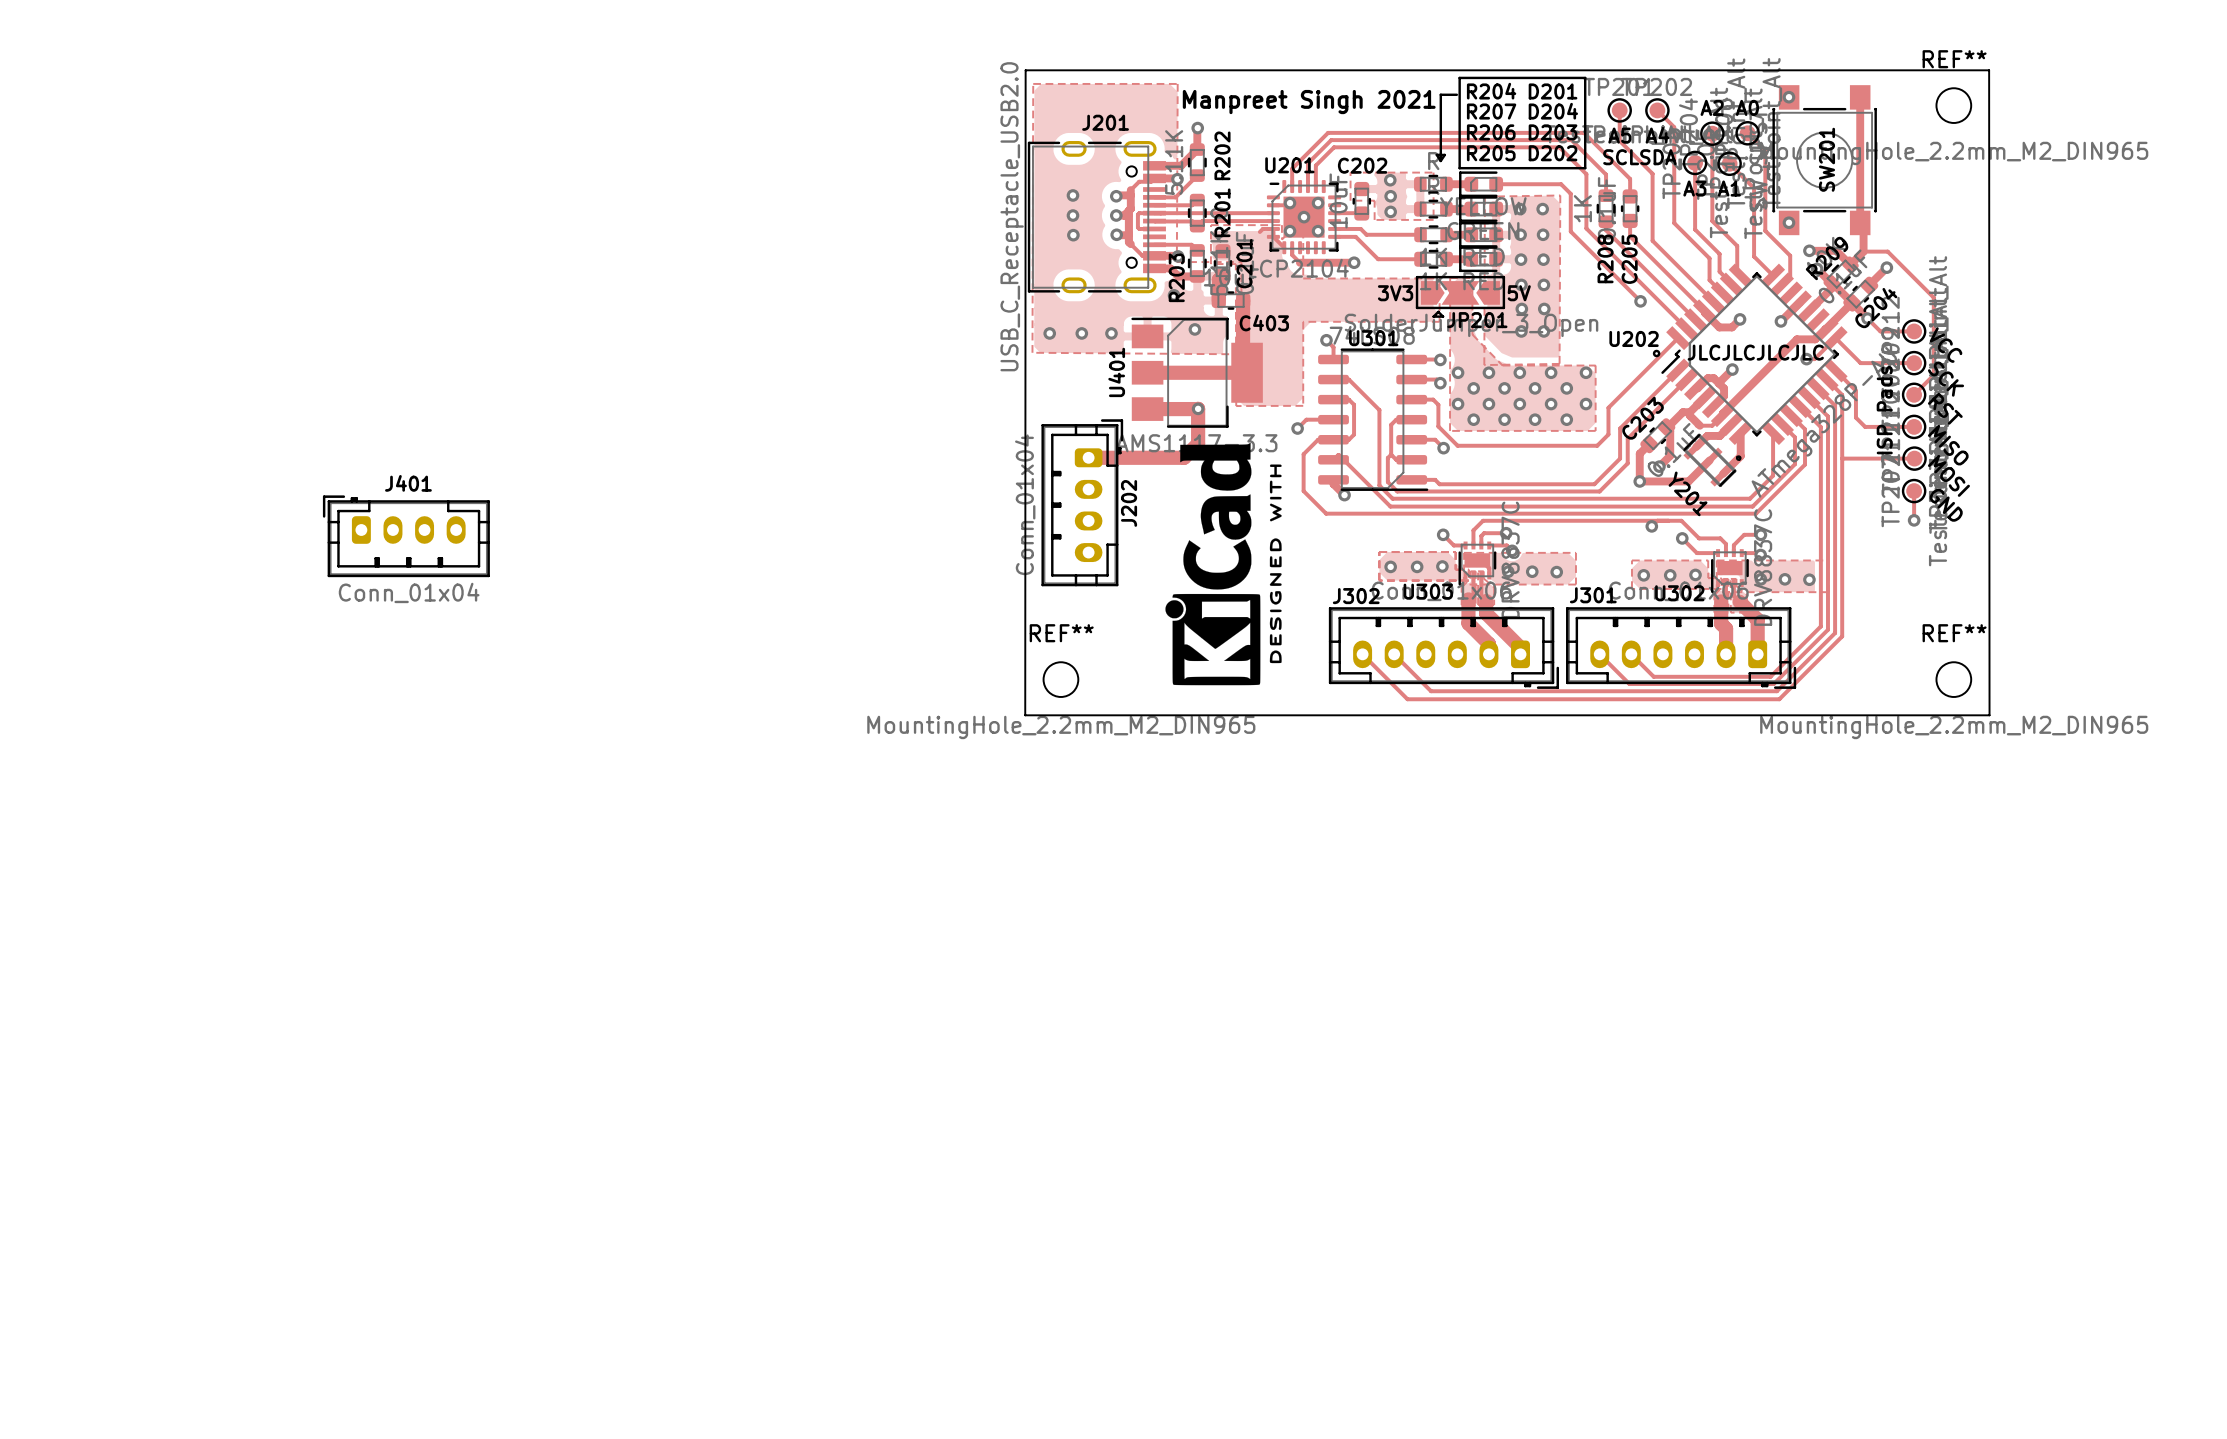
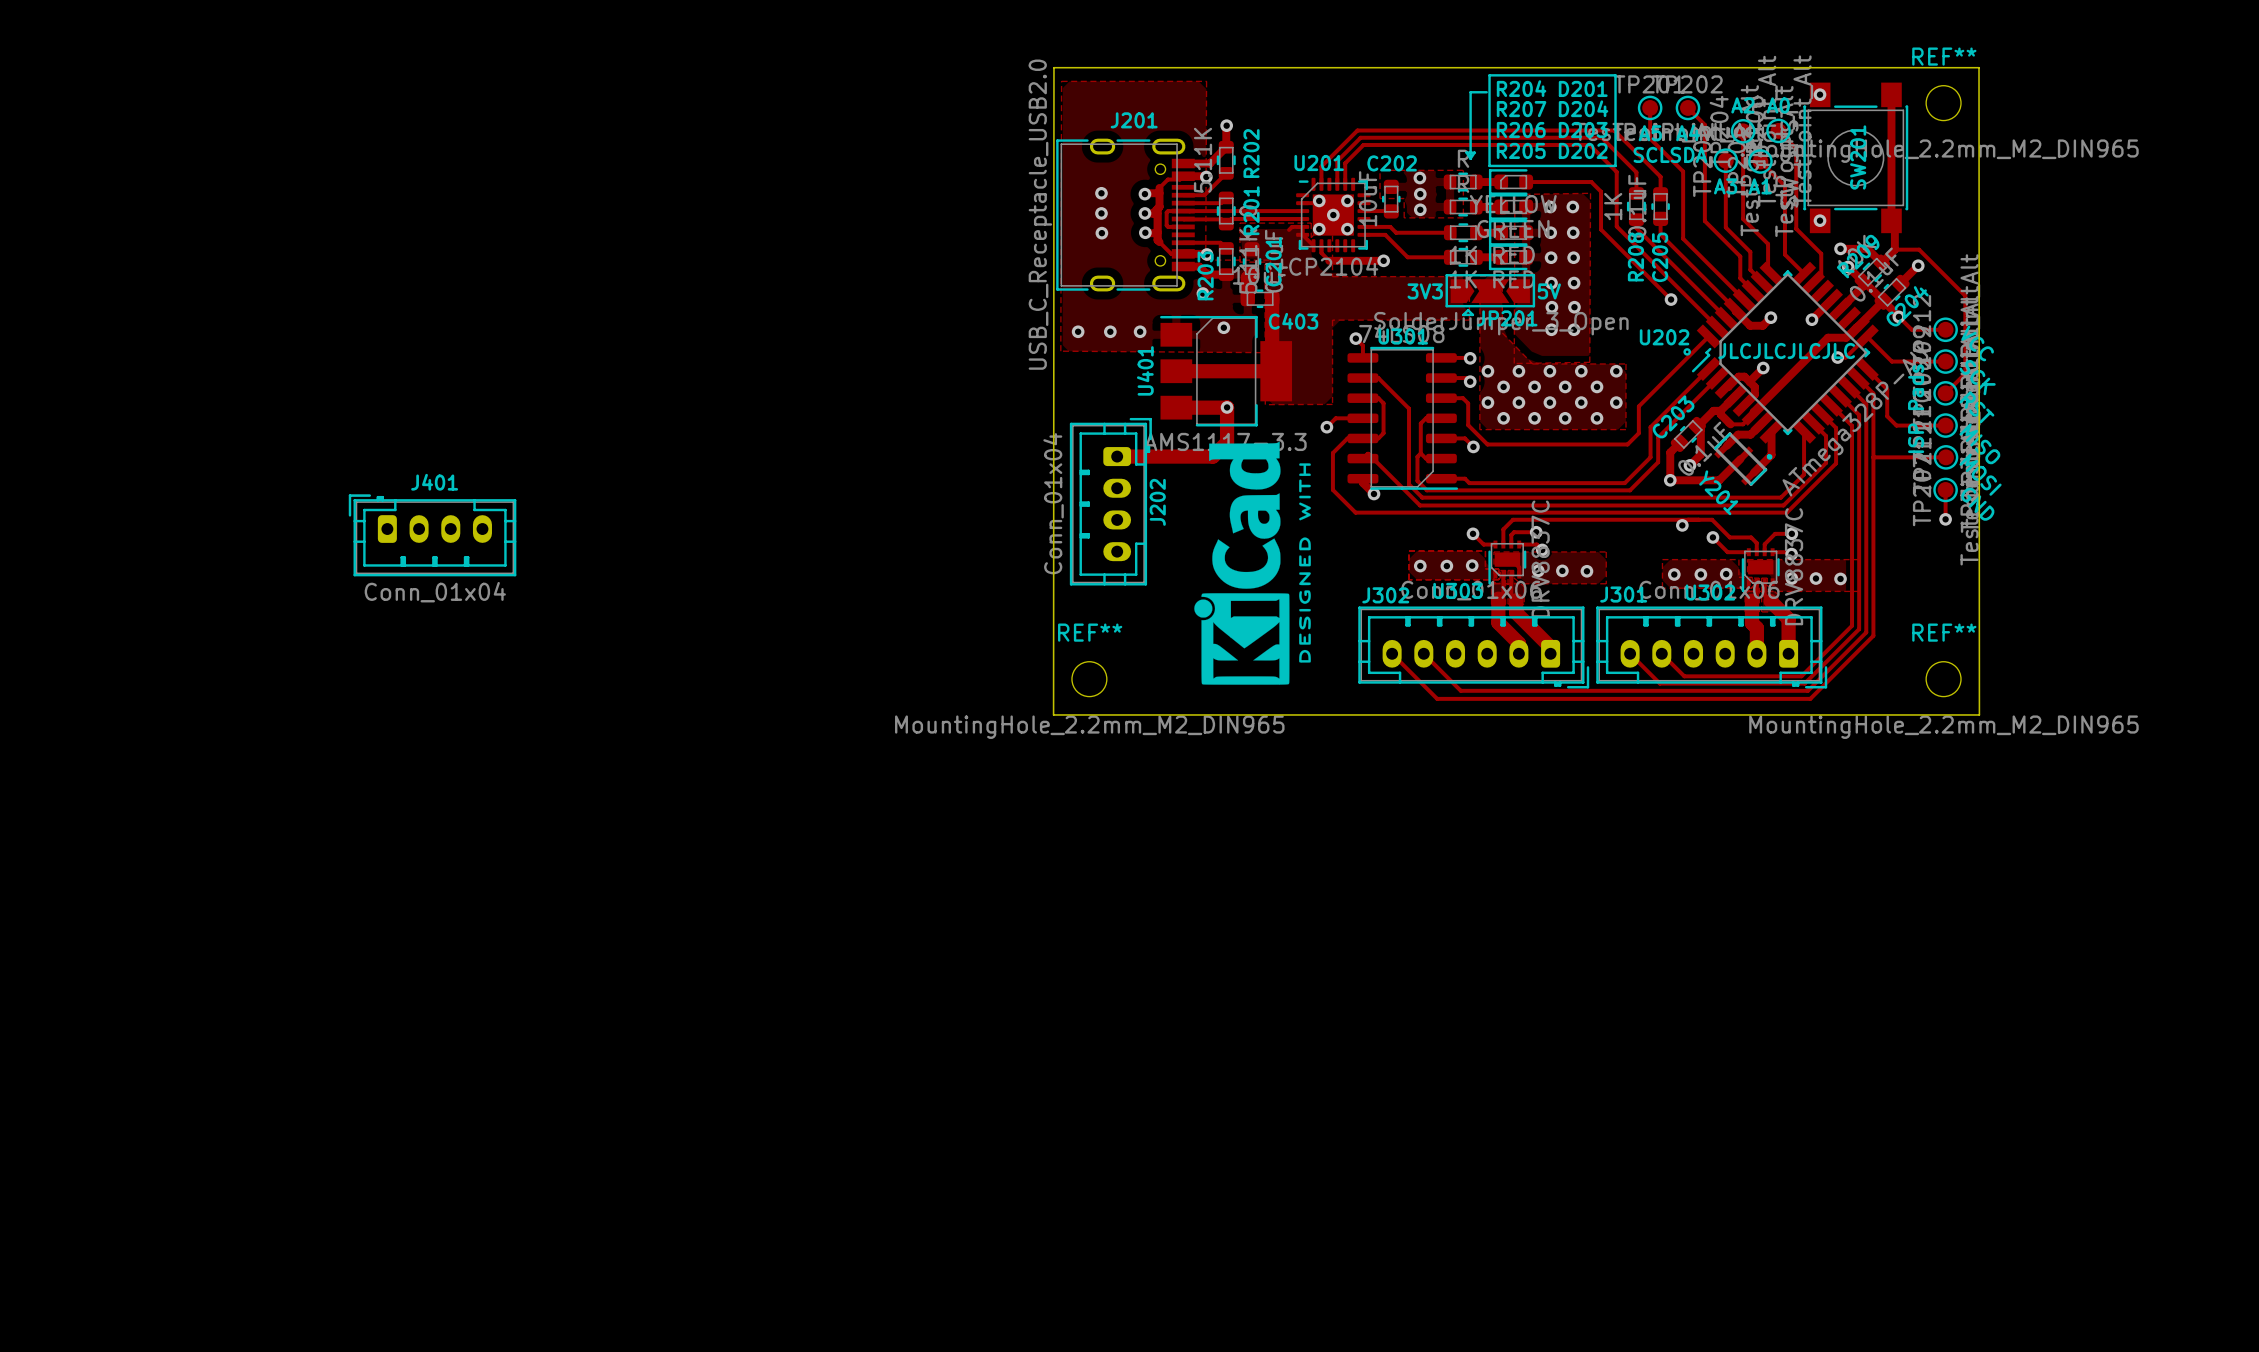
board edge: (1947, 70) (1989, 70) (1989, 715) (1947, 715) -> (1979, 67) (1979, 714)
text: Manpreet Singh 2021 (1309, 102) -> none
REF** position: (1953, 105) -> (1943, 103)
REF** position: (1953, 679) -> (1943, 679)

